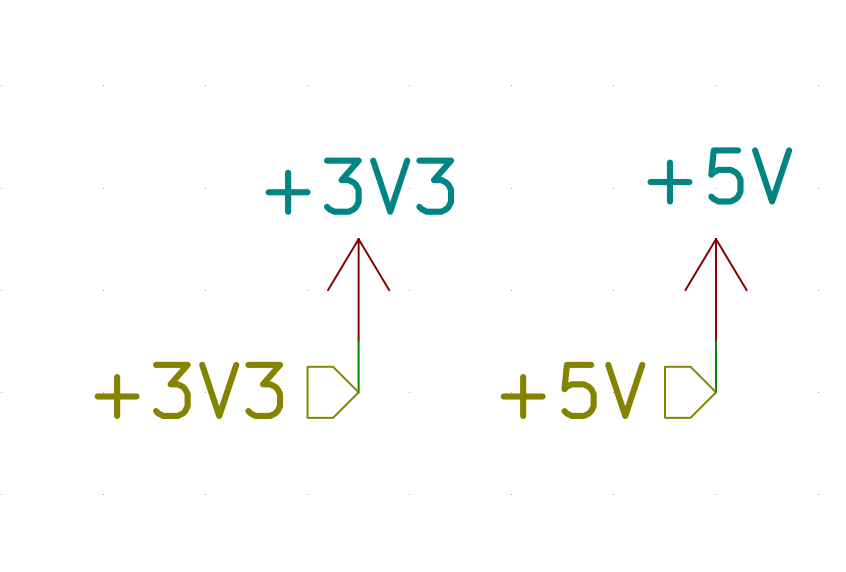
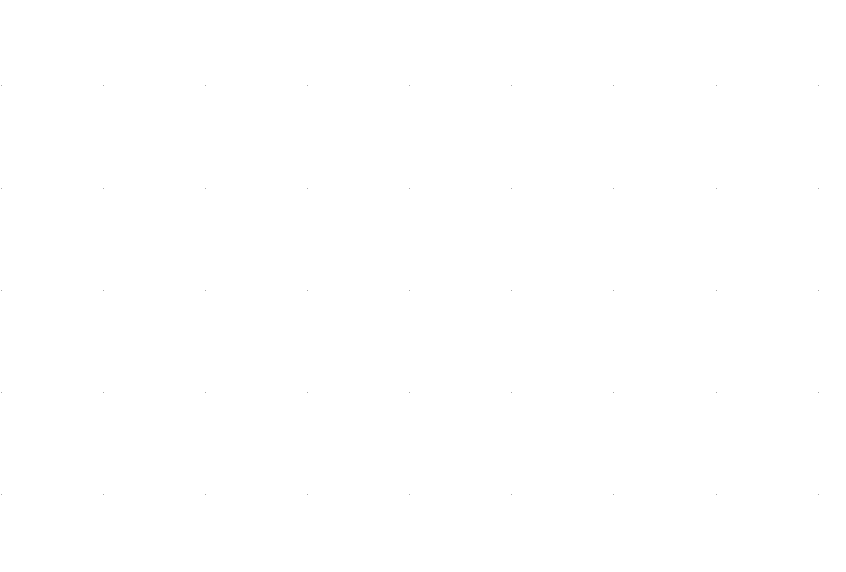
power symbol: +3V3 (358, 290) -> none
power symbol: +5V (716, 290) -> none
wire: (358, 341) (358, 392) -> none
wire: (716, 341) (716, 392) -> none
hierarchical label: +3V3 (188, 390) -> none
hierarchical label: +5V (572, 390) -> none

